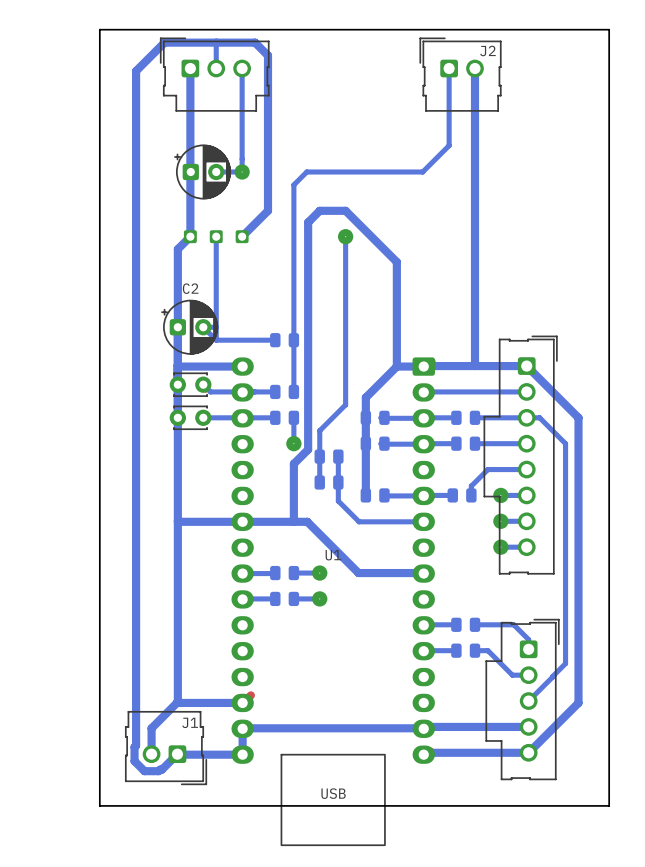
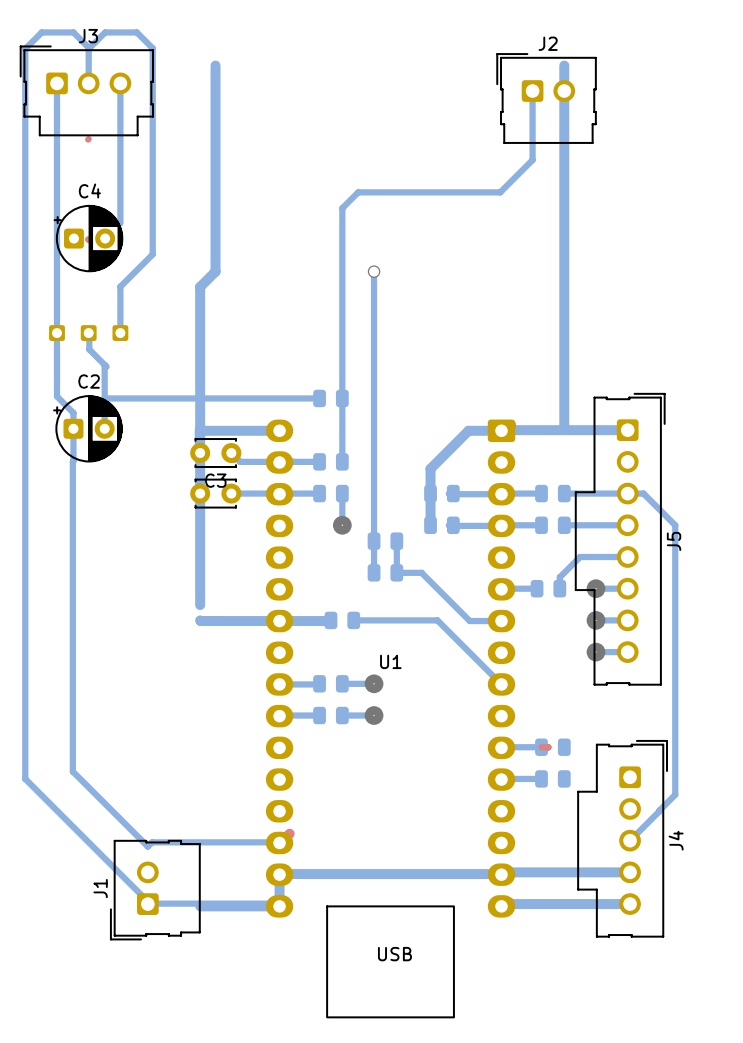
board edge: (99, 29) (609, 29) (609, 805) (99, 805) (99, 29) -> none
bottom track: (216, 42) (216, 68) -> none
J2 name position: J2 (487, 50) -> J2 (548, 43)
bottom track: none -> (89, 48) (73, 32) (41, 32) (25, 48) (25, 778) (147, 901) (147, 904) (286, 903)
bottom track: (242, 68) (242, 172) (216, 172) -> none
bottom track: (449, 68) (449, 89) -> none
part: (214, 74) -> none
J2 position: (460, 74) -> (546, 98)
bottom track: none -> (56, 83) (56, 396) (73, 412) (72, 771) (147, 846) (152, 842) (286, 842)
bottom track: none -> (88, 83) (88, 48) (105, 32) (136, 32) (152, 48) (152, 254) (120, 286) (120, 333)
bottom track: none -> (120, 83) (120, 223)
J3: none -> (86, 90)
top track: none -> (88, 139) (88, 139)
part: (202, 172) -> none
via: (242, 172) -> none
C4: none -> (88, 238)
top track: none -> (88, 239) (88, 239)
bottom track: (216, 236) (216, 340) (203, 327) (216, 327) -> none
part position: (216, 236) -> (88, 333)
bottom track: (242, 236) (268, 210) (268, 55) (255, 42) (164, 42) (136, 71) (134, 761) (144, 771) (158, 771) (177, 754) -> none
via: none -> (374, 271)
bottom track: (345, 236) (345, 404) (319, 430) -> (374, 271) (374, 509)
via: (345, 236) -> none
bottom track: none -> (88, 333) (89, 349) (106, 366)
bottom track: none -> (105, 365) (104, 428)
C2 position: (189, 327) -> (87, 428)
bottom track: none -> (106, 398) (247, 398)
bottom track: (396, 366) (396, 262) (345, 210) (319, 210) (308, 222) (308, 449) (293, 463) (293, 521) -> none
bottom track: (526, 366) (578, 417) (578, 702) (528, 752) -> none
bottom track: (526, 391) (423, 392) -> none
C3 name: none -> C3 (215, 480)
bottom track: (365, 443) (365, 495) -> none
J5 name: none -> J5 (674, 541)
bottom track: (338, 482) (338, 501) (359, 521) (397, 521) -> (396, 572) (421, 572) (469, 621)
part position: (375, 495) -> (342, 620)
bottom track: (384, 495) (423, 495) -> none
bottom track: (177, 508) (177, 702) -> none
bottom track: (280, 521) (307, 521) (358, 573) (423, 573) -> (353, 620) (437, 620) (500, 683)
top track: none -> (541, 747) (547, 747)
bottom track: (475, 624) (513, 624) (528, 639) (528, 649) -> none
bottom track: (475, 650) (487, 650) (512, 675) (528, 675) -> none
J4 name: none -> J4 (676, 840)
bottom track: (242, 702) (176, 702) (151, 728) (151, 754) -> none
J1 name position: J1 (190, 722) -> J1 (100, 888)
J1 rotation: 0° (166, 748) -> 90° clockwise (155, 890)

